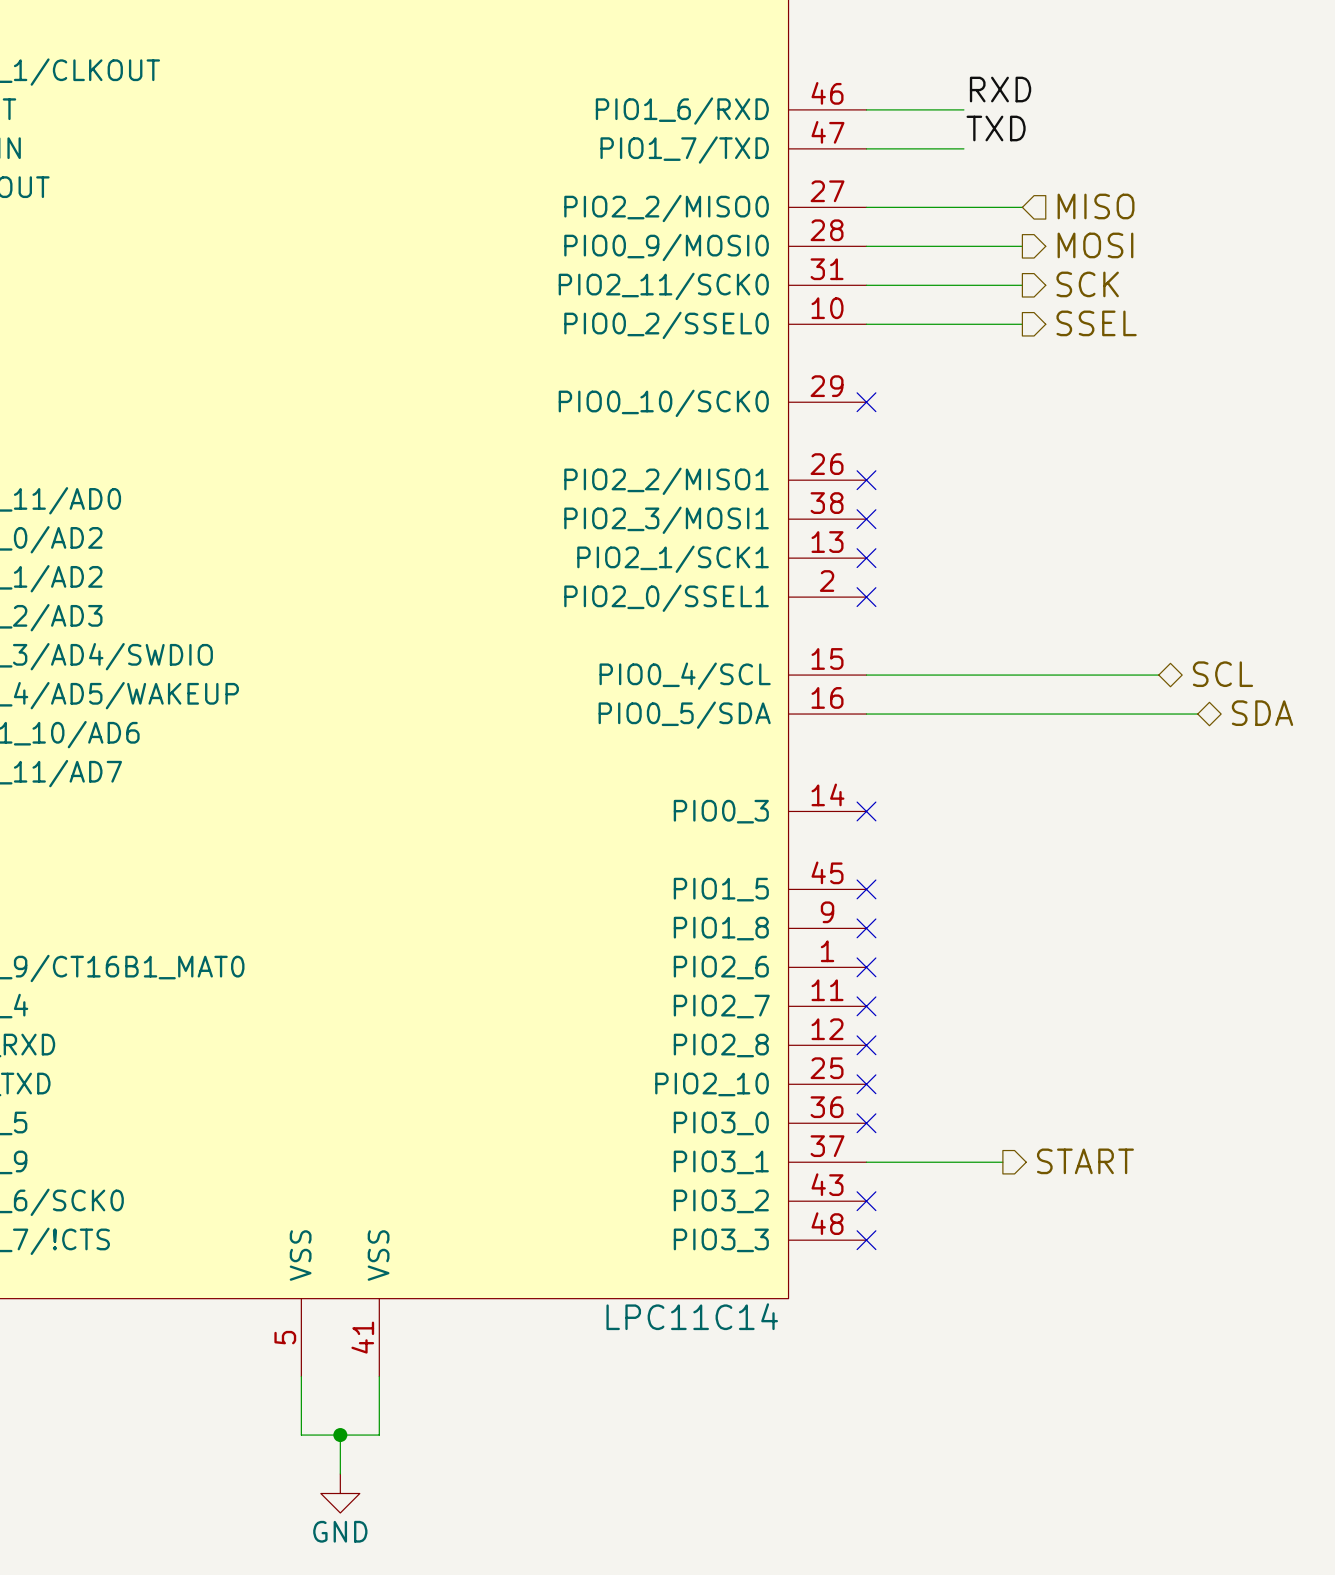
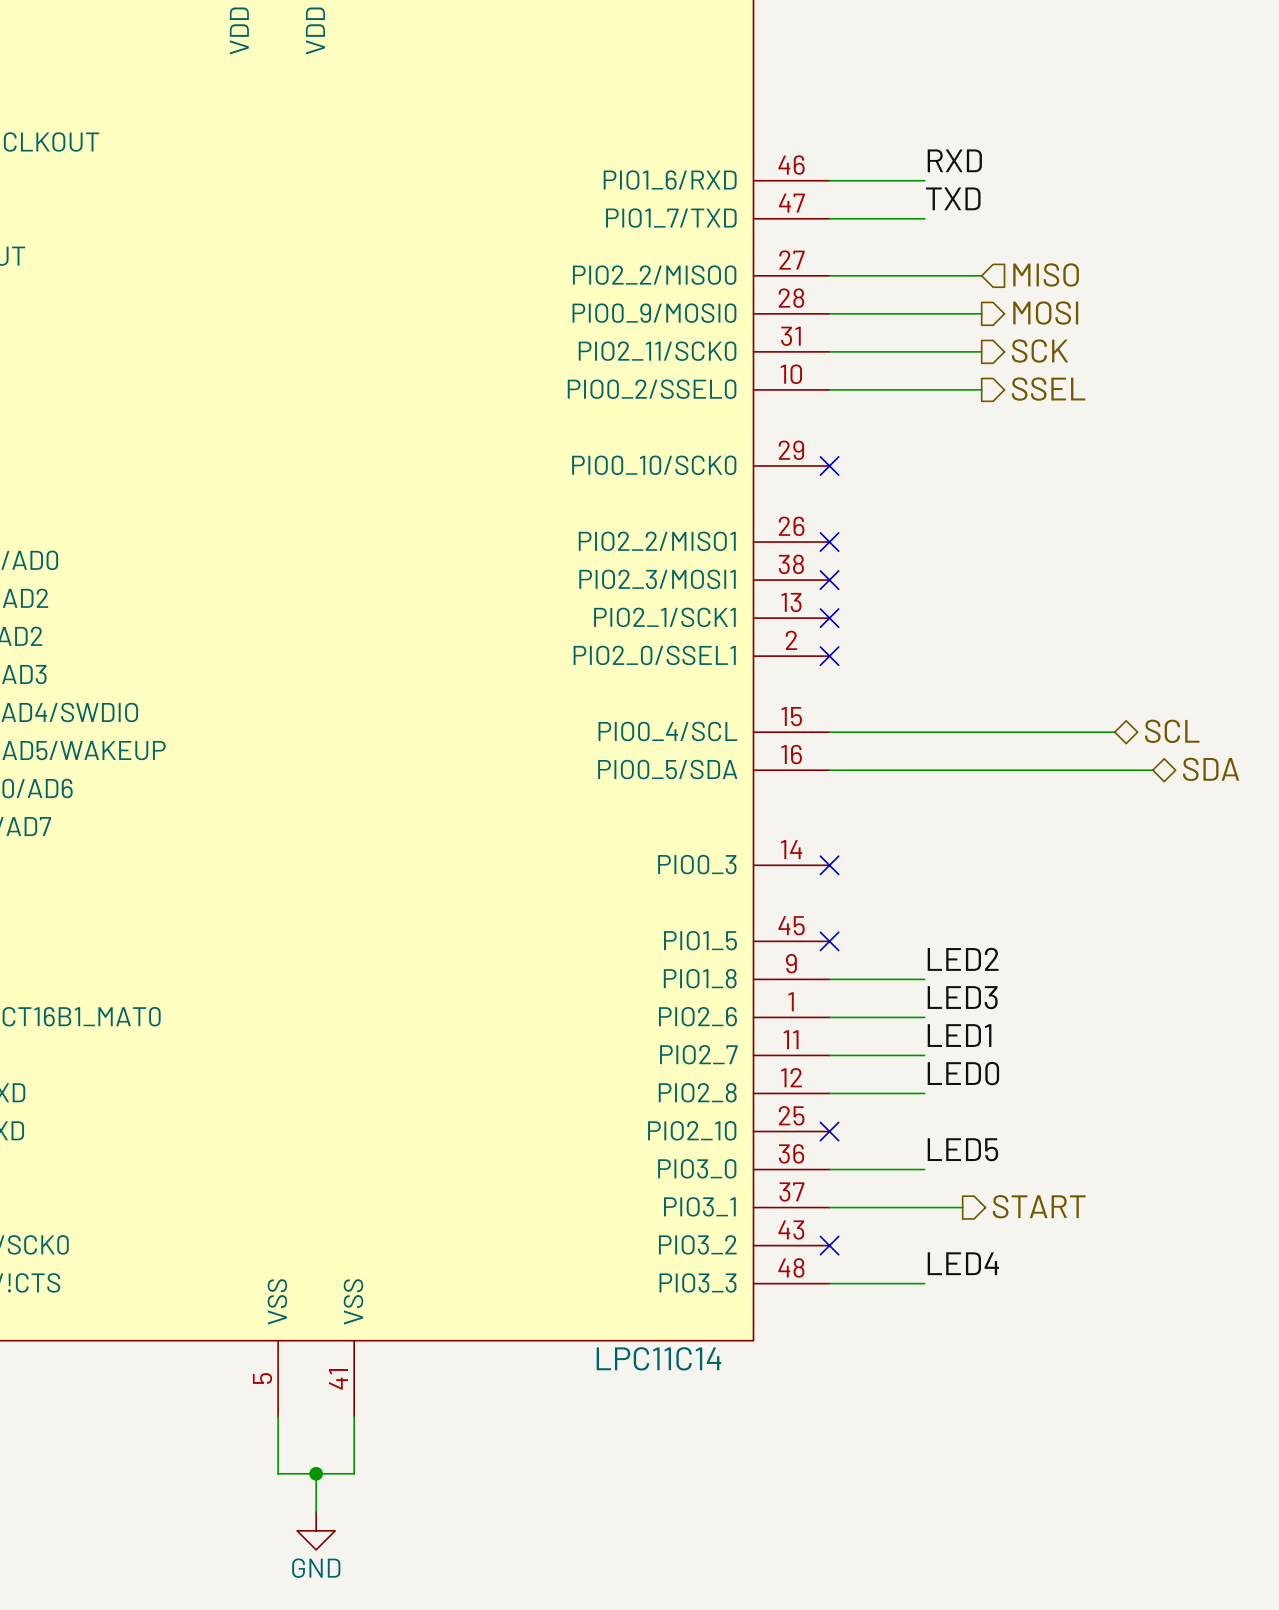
label: none -> LED2 (963, 959)
wire: none -> (829, 979) (924, 979)
no-connect mark: (866, 928) -> none
label: none -> LED3 (962, 997)
wire: none -> (829, 1017) (924, 1017)
no-connect mark: (866, 967) -> none
label: none -> LED1 (959, 1035)
wire: none -> (829, 1055) (924, 1055)
no-connect mark: (866, 1006) -> none
label: none -> LED0 (963, 1073)
wire: none -> (829, 1093) (924, 1093)
no-connect mark: (866, 1045) -> none
label: none -> LED5 (962, 1149)
wire: none -> (829, 1169) (924, 1169)
no-connect mark: (866, 1123) -> none
label: none -> LED4 (963, 1263)
wire: none -> (829, 1283) (924, 1283)
no-connect mark: (866, 1240) -> none

